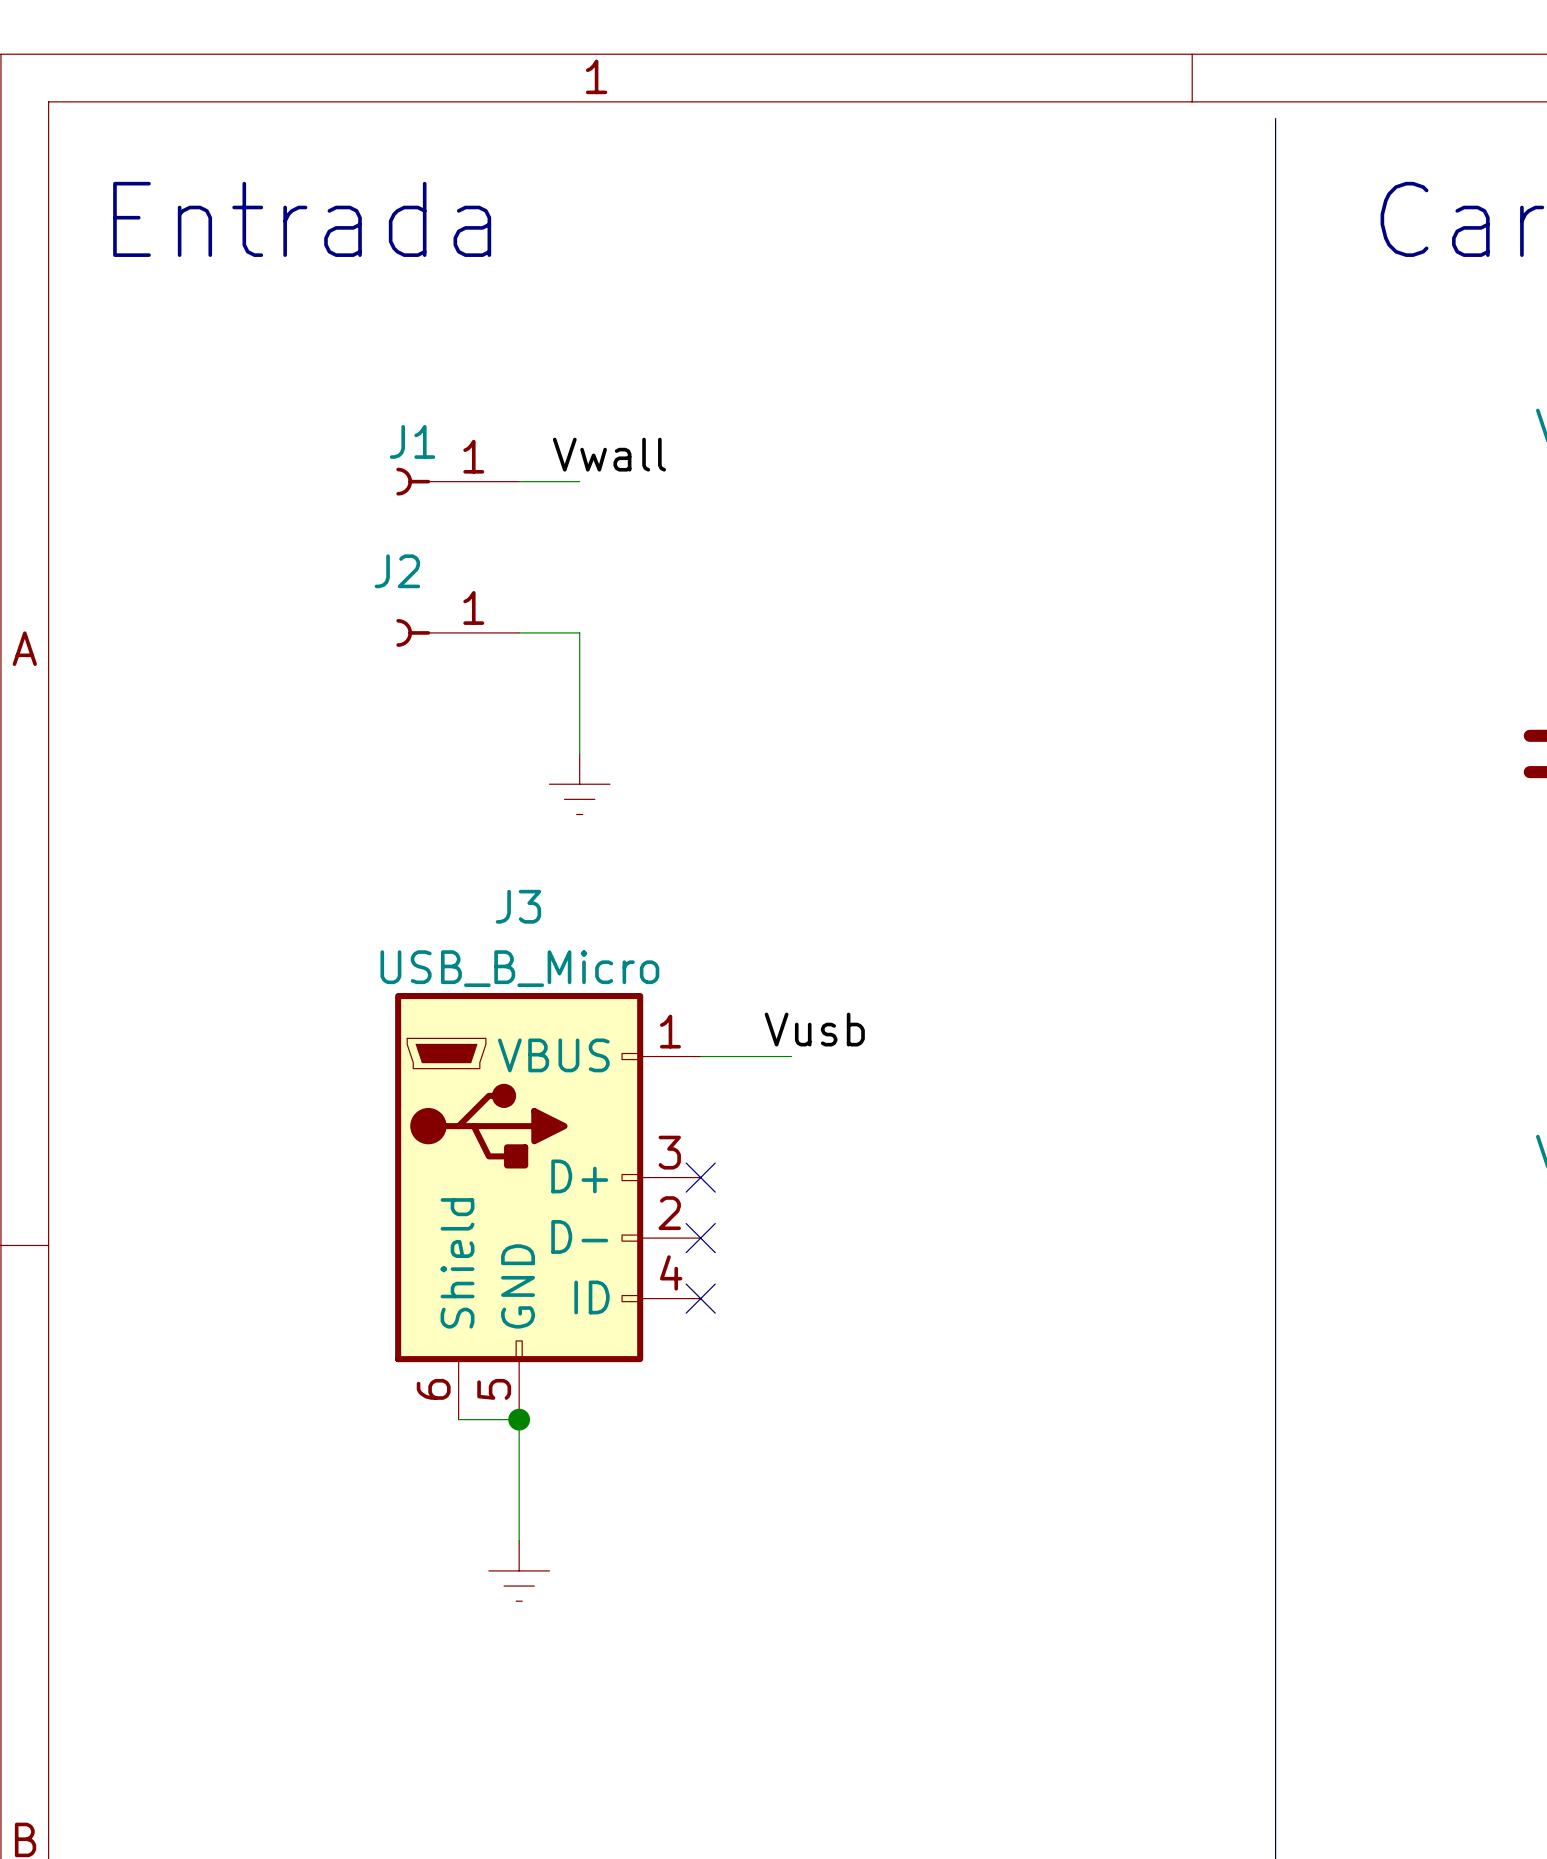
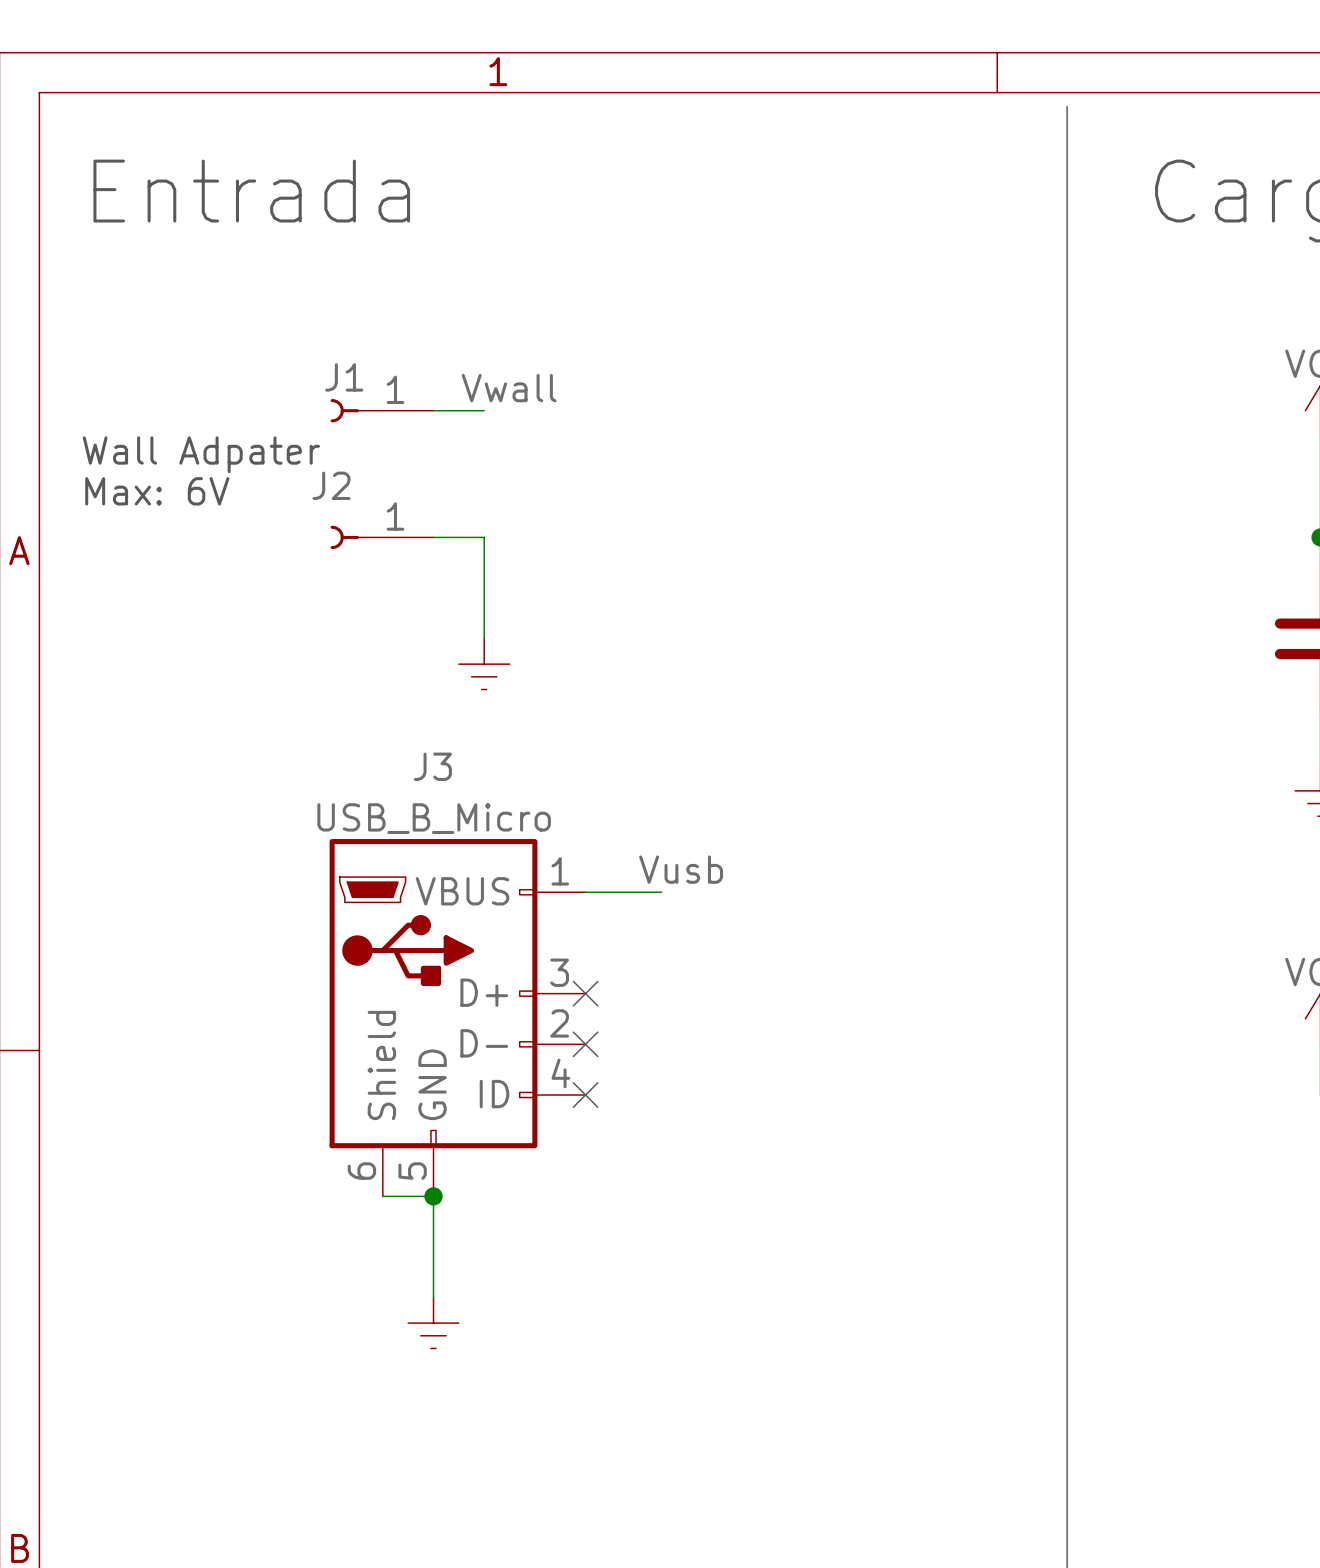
text: none -> Wall Adpater (201, 454)
text: none -> Max: 6V (157, 491)

